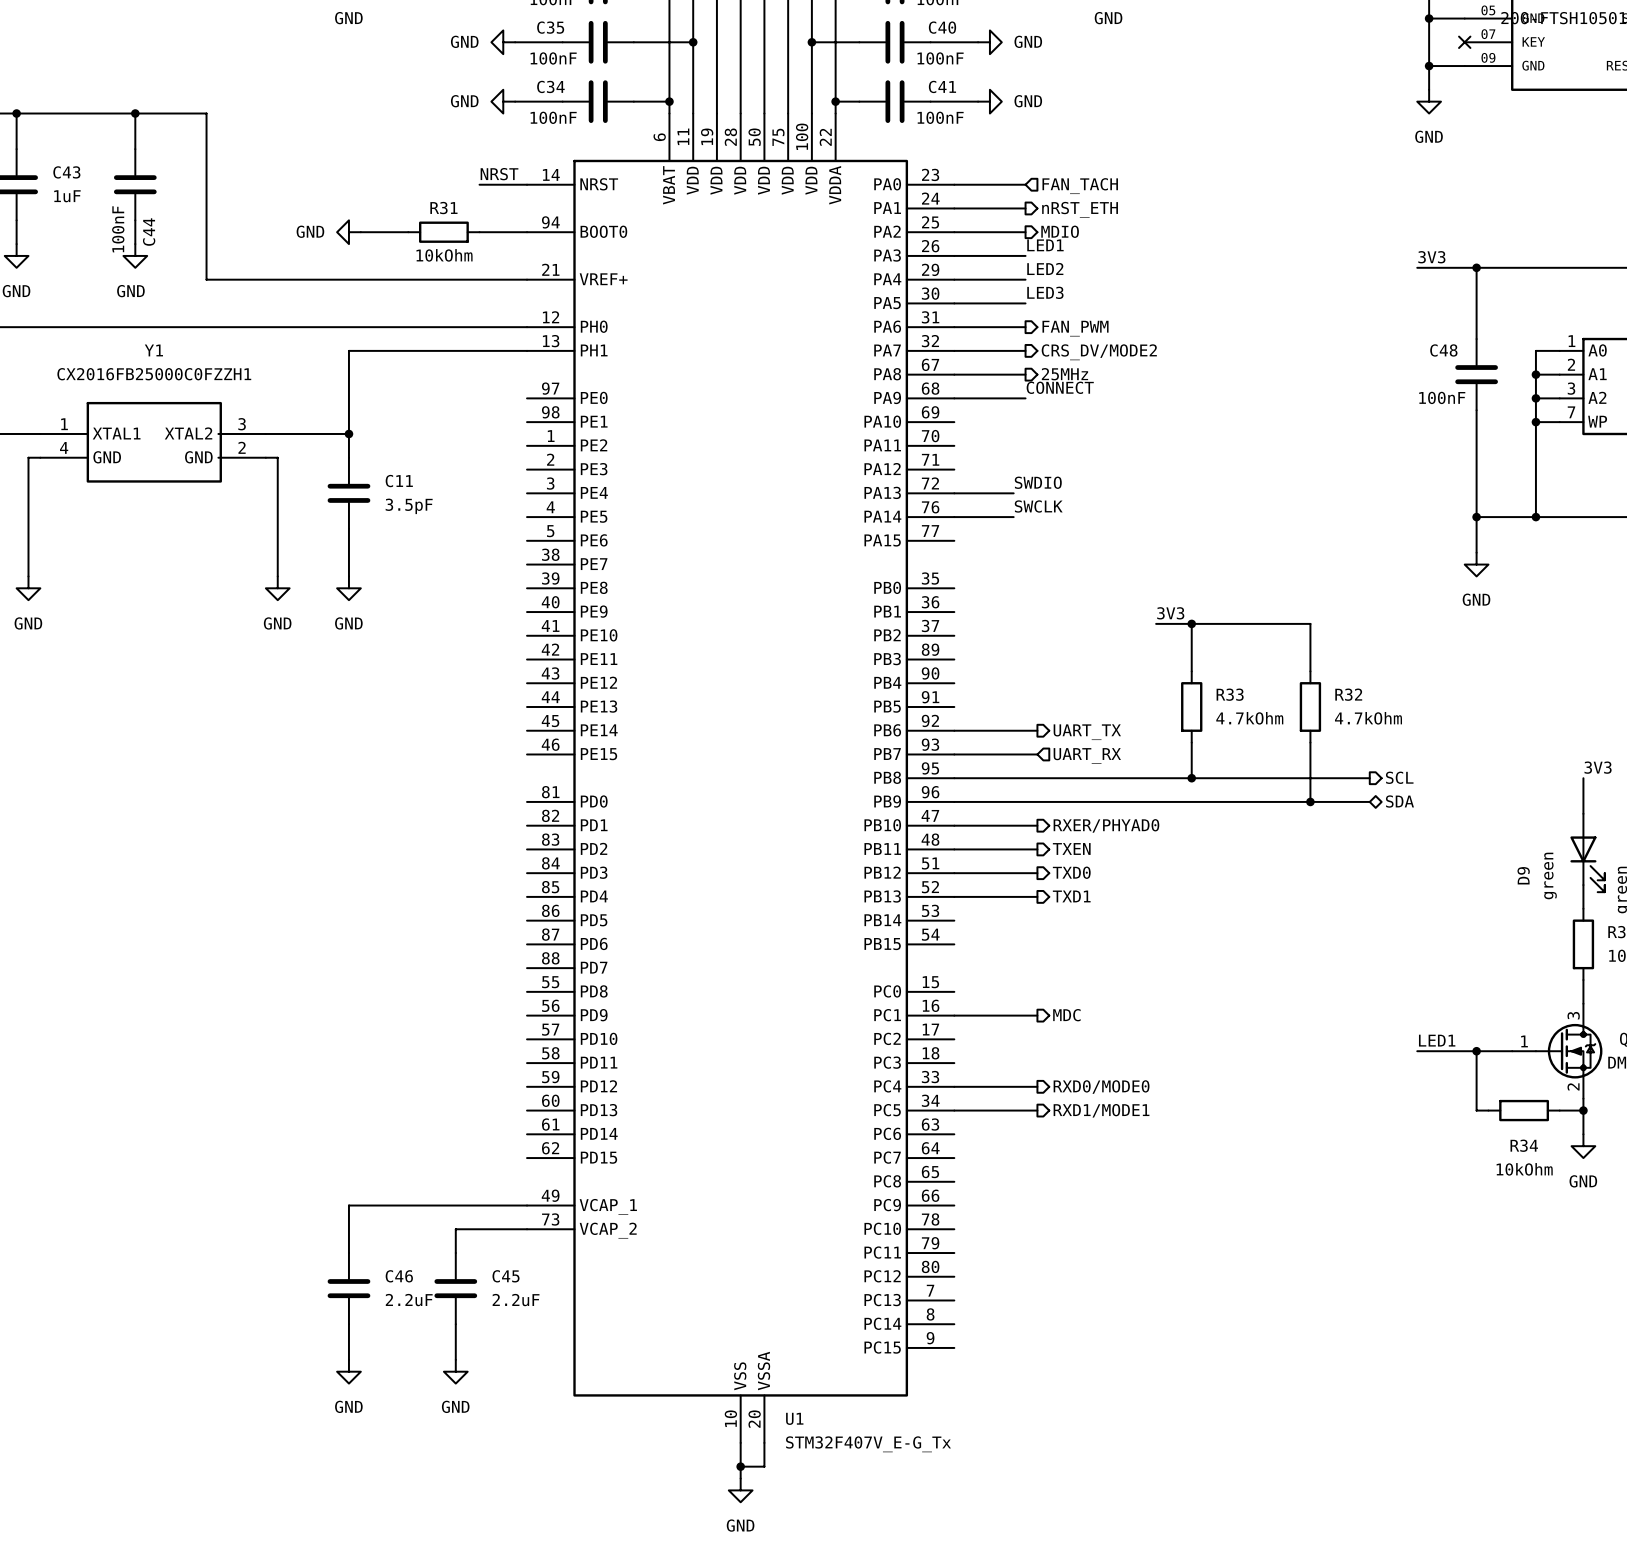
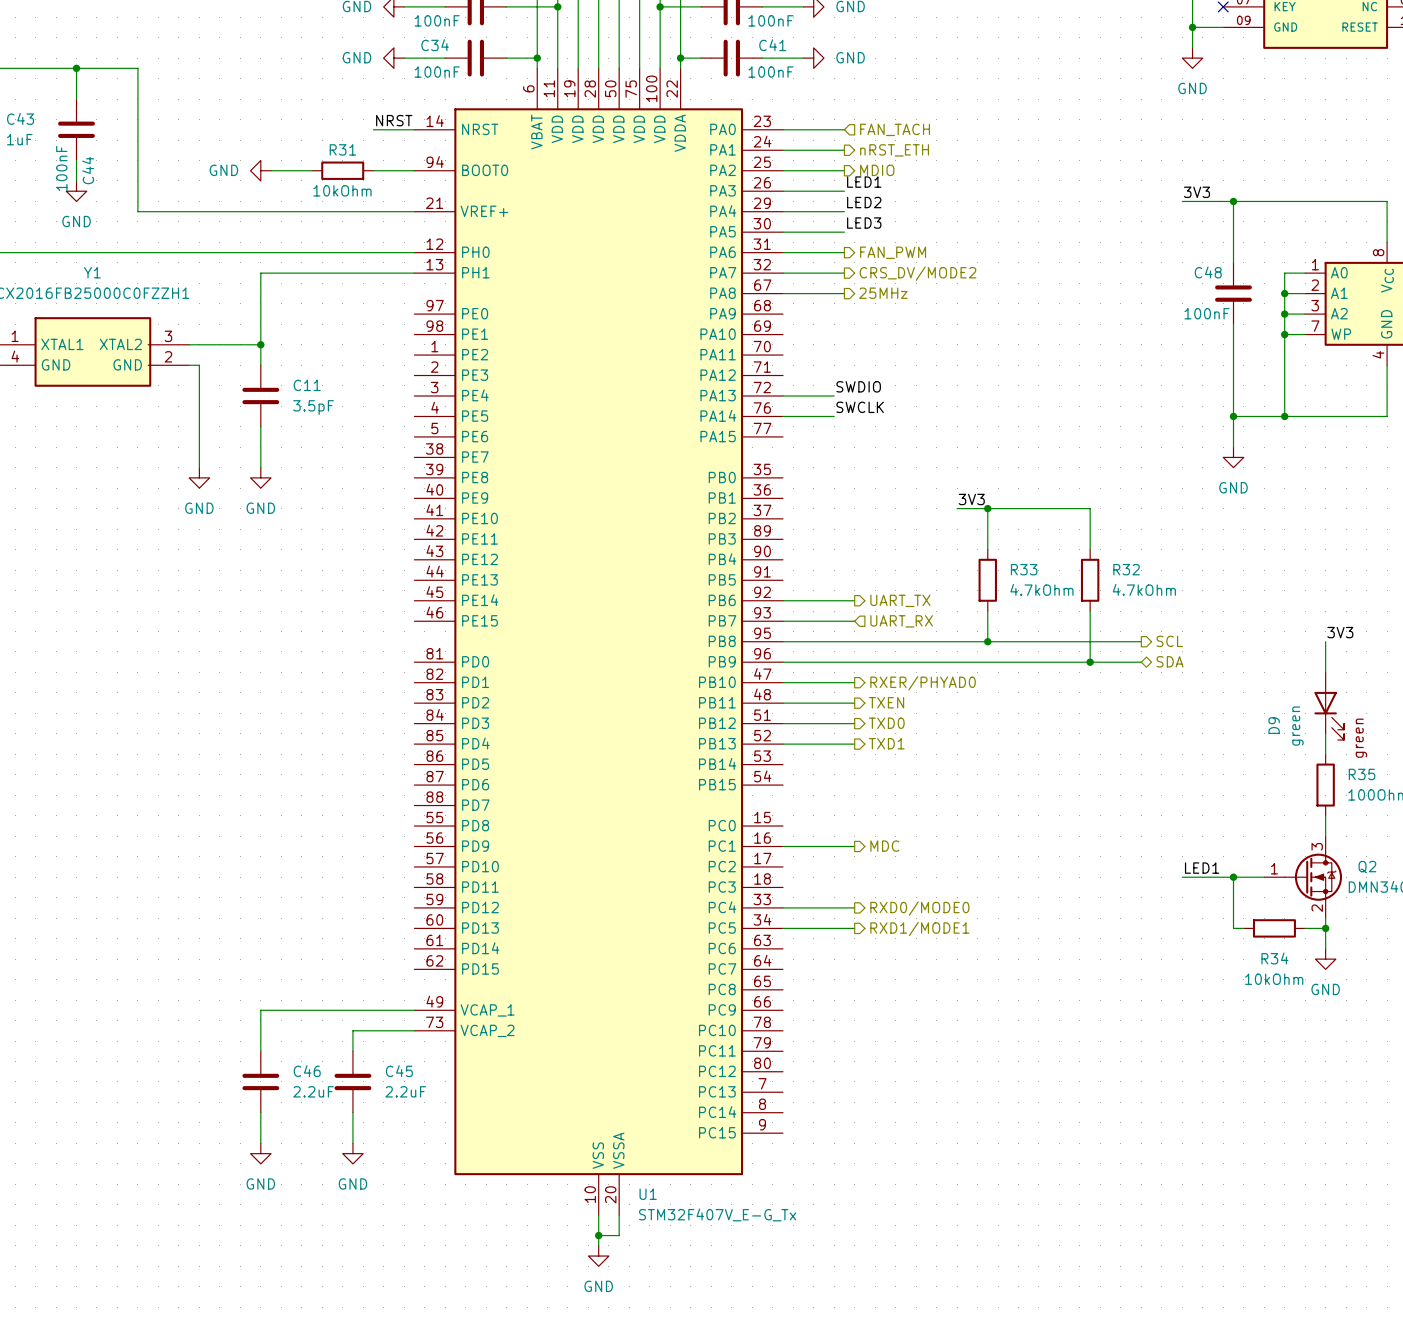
label: CONNECT (1060, 387) -> none
wire: (954, 398) (1025, 398) -> none

